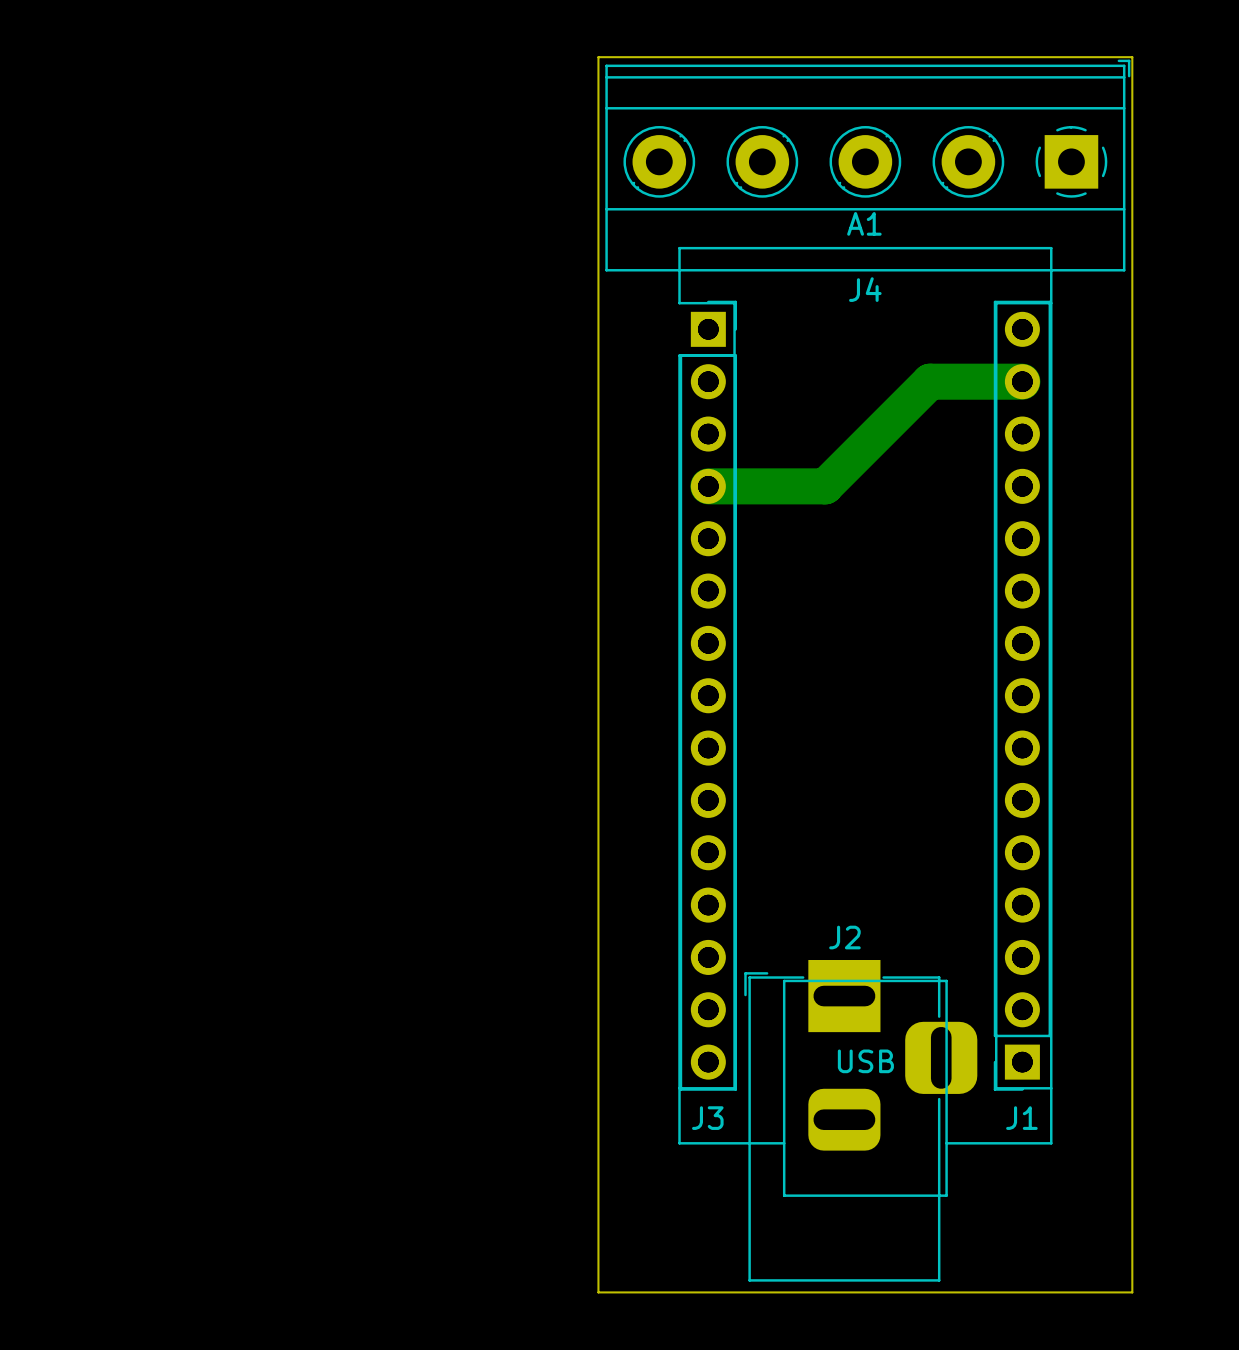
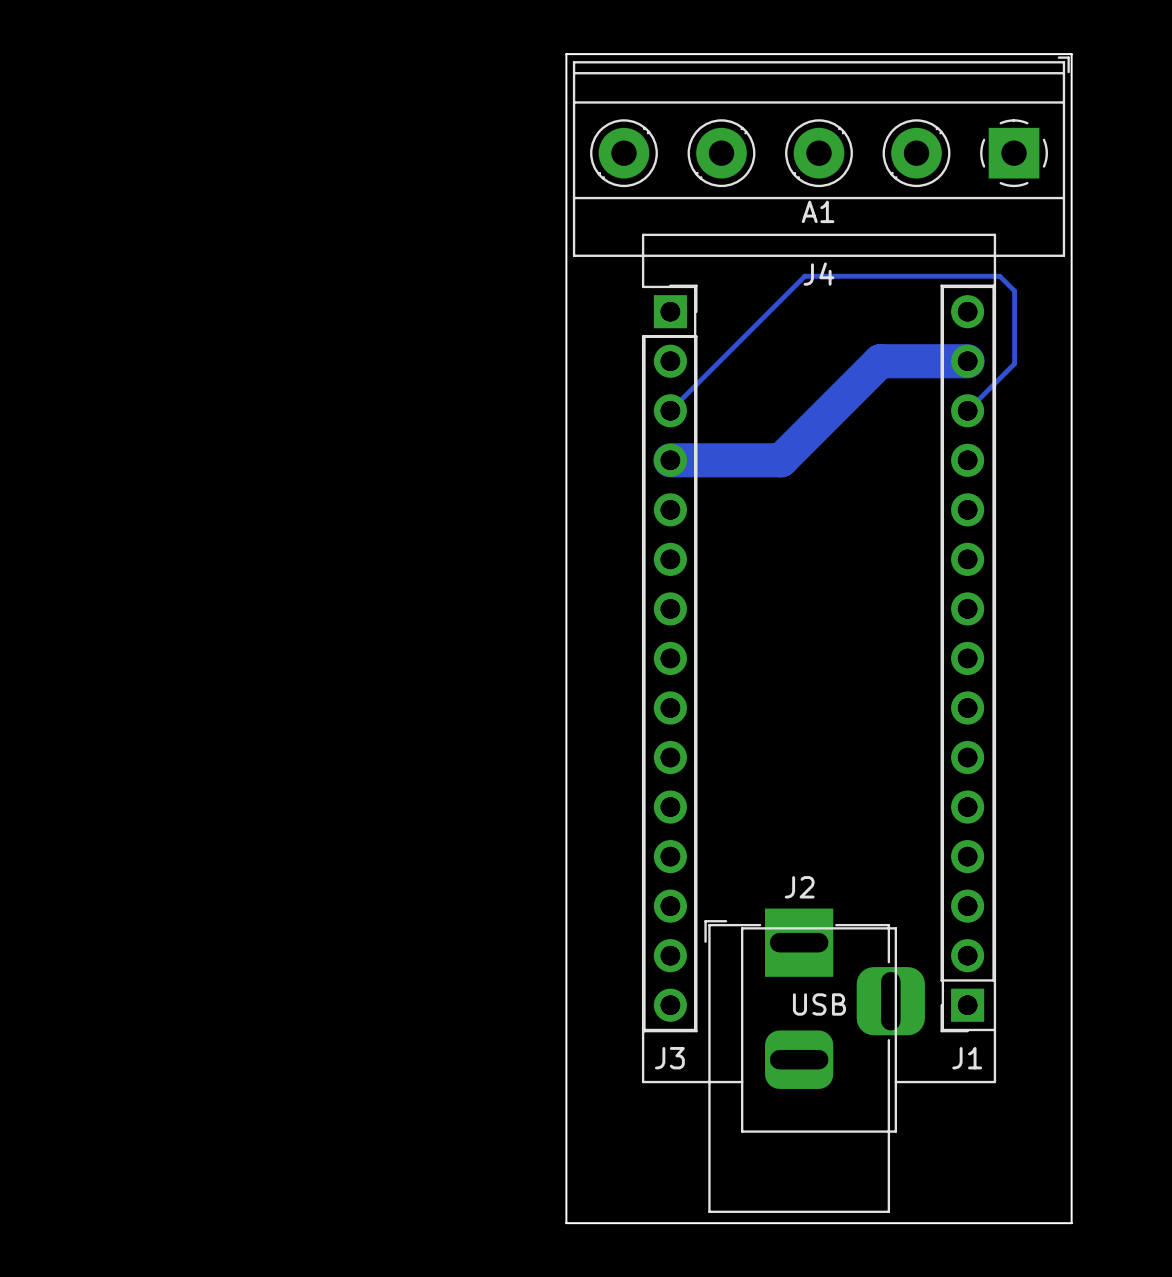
track: none -> (967, 410) (1014, 363) (1014, 291) (999, 276) (804, 276) (670, 410)

